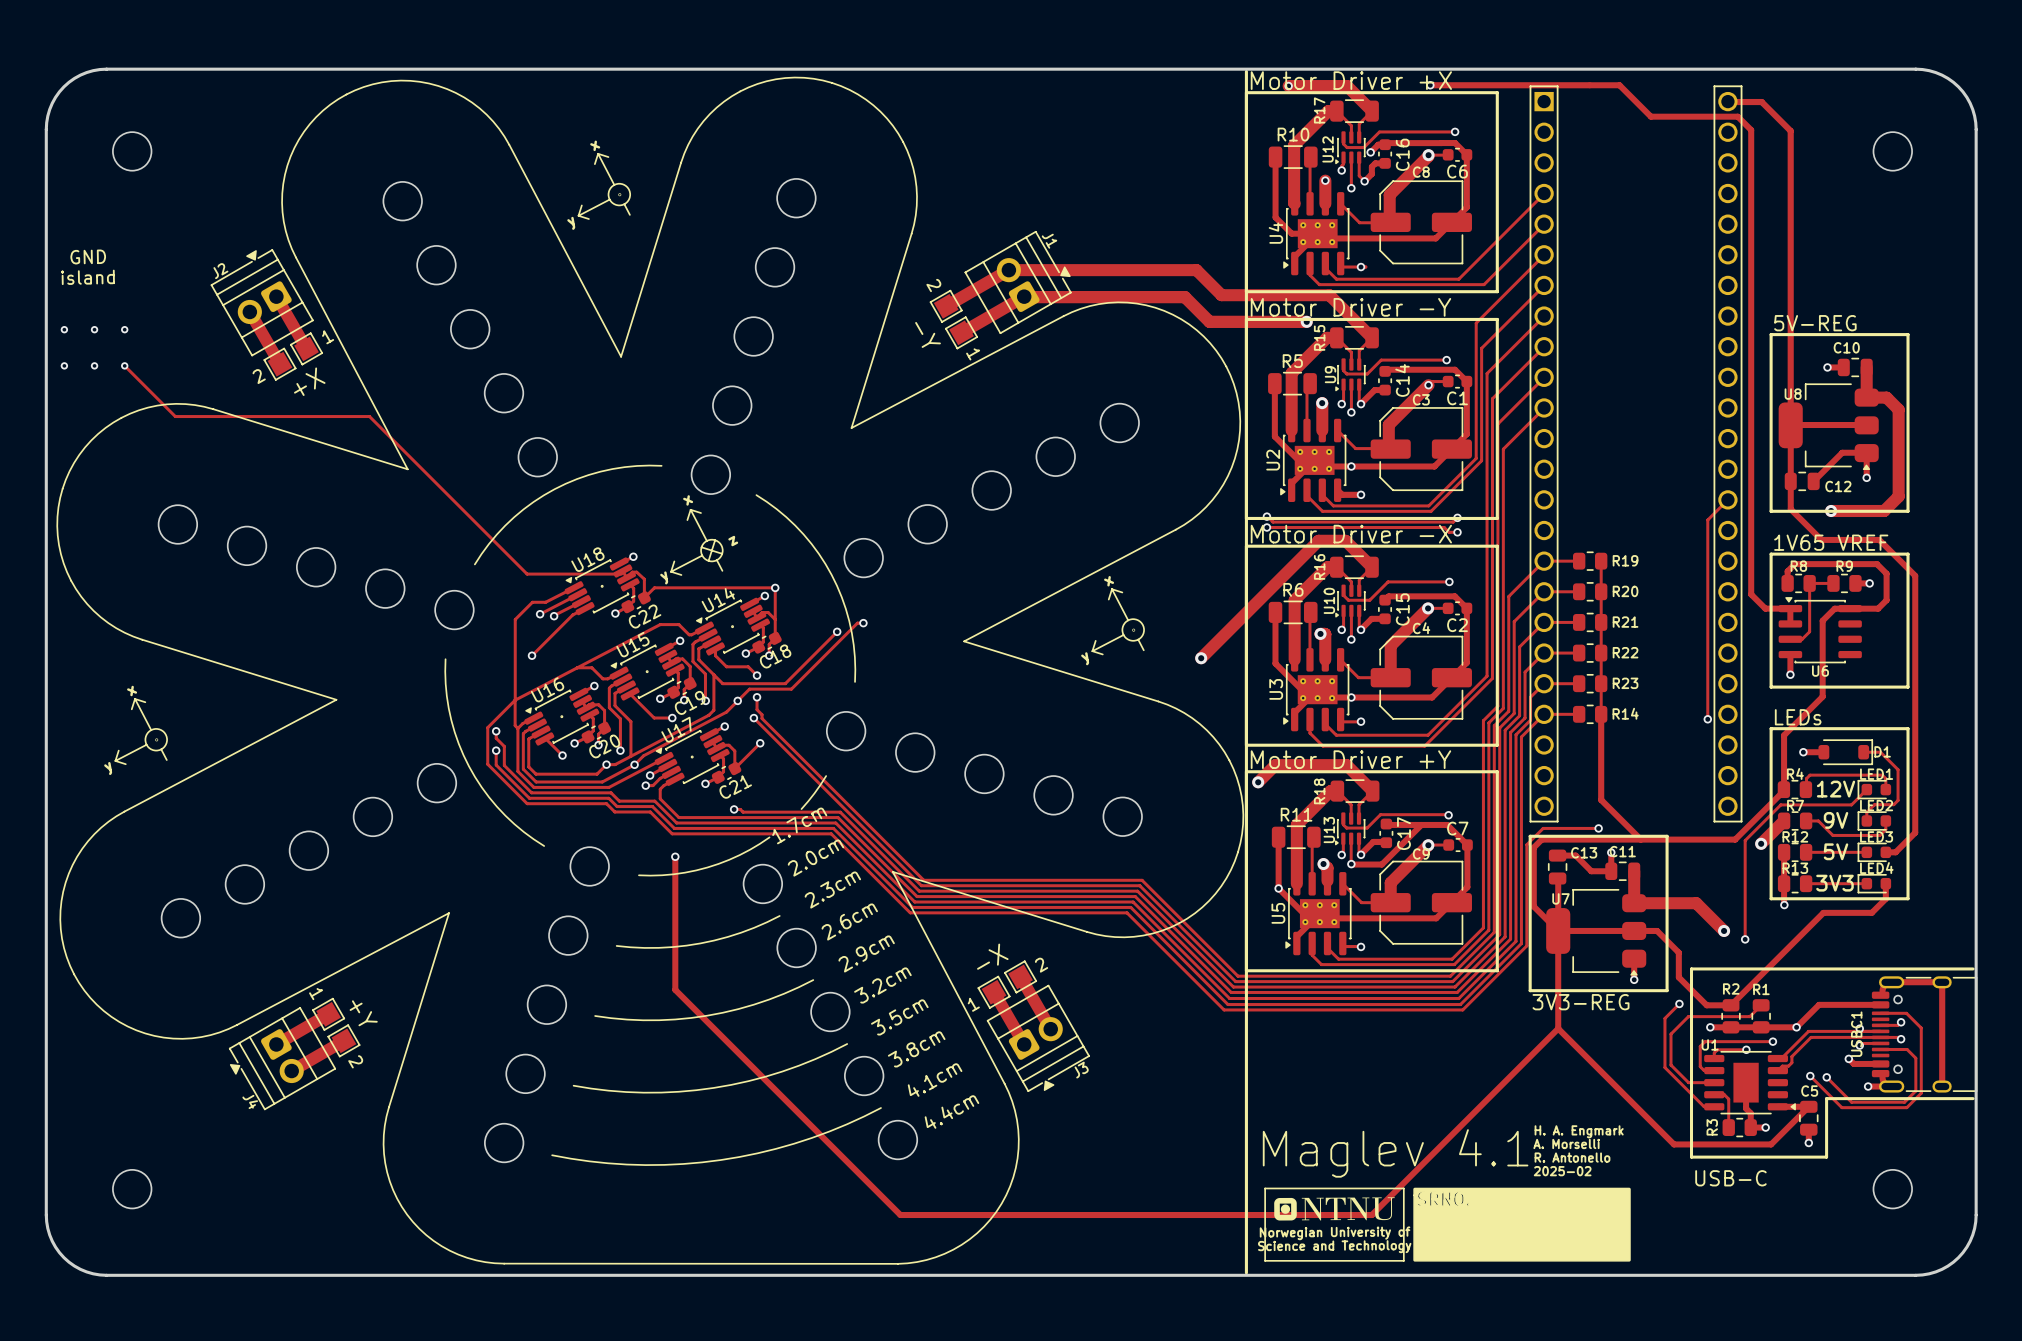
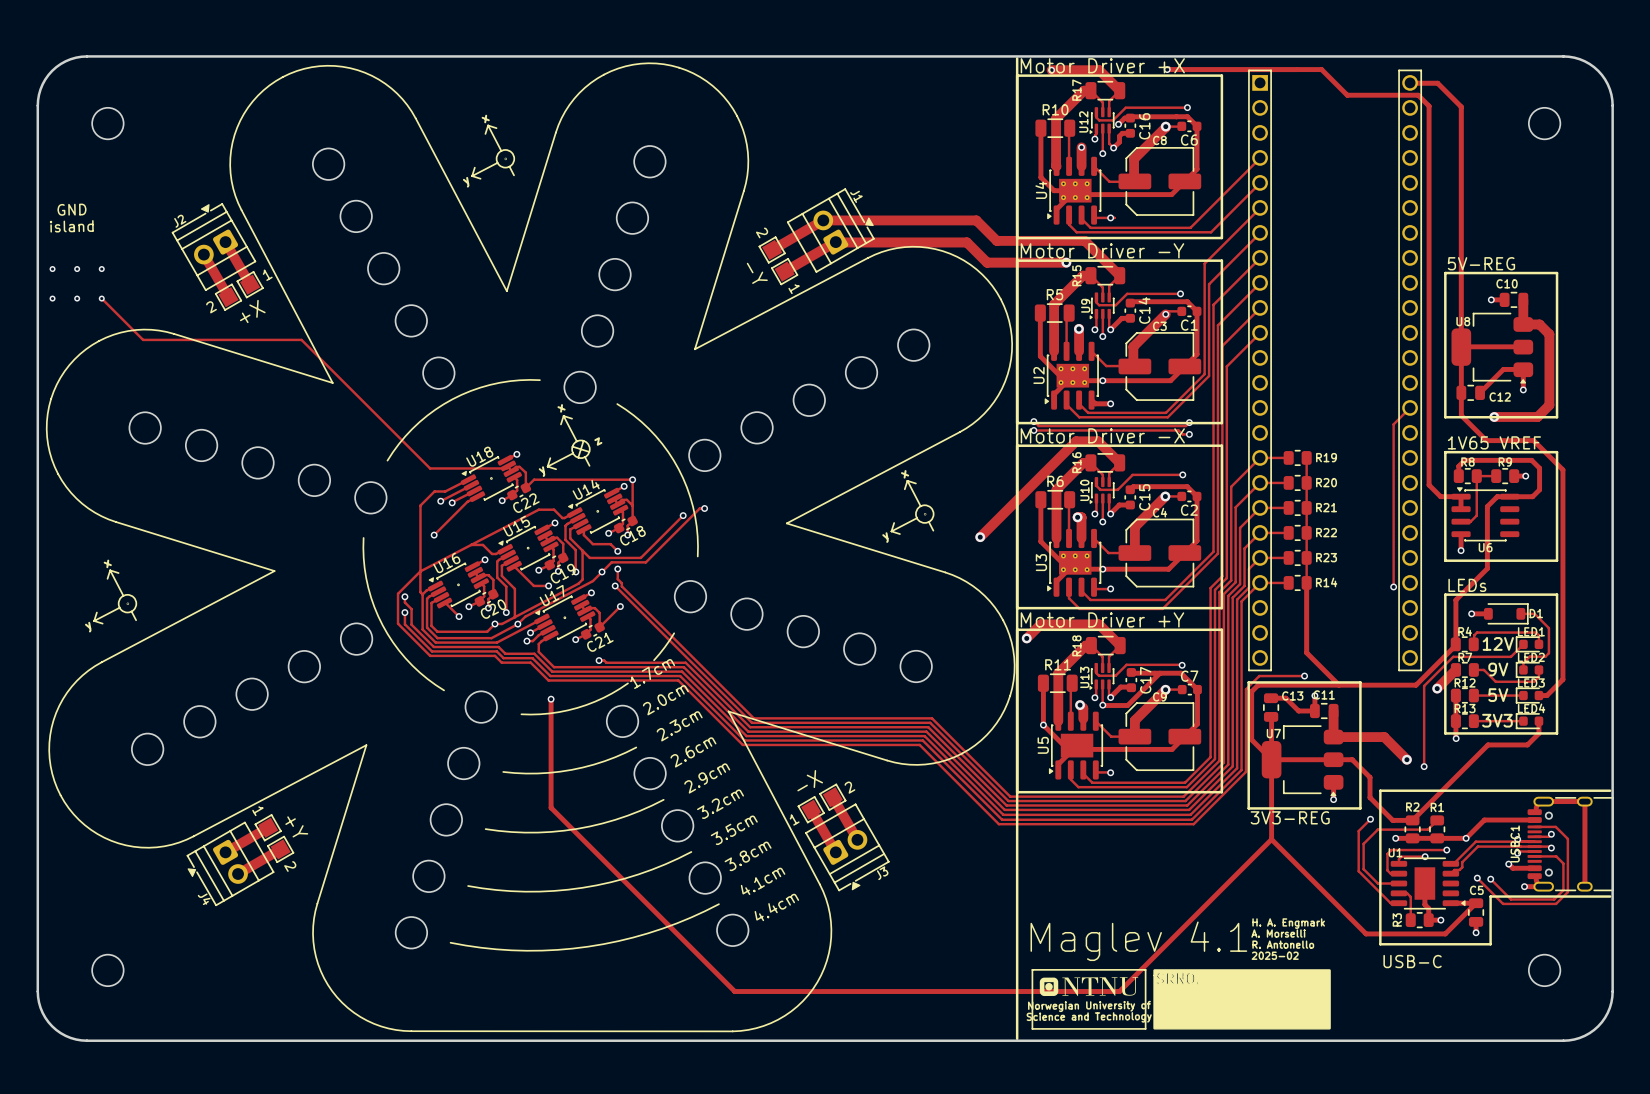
U5 footprint: [1285, 872, 1352, 956] -> [1048, 711, 1103, 780]

